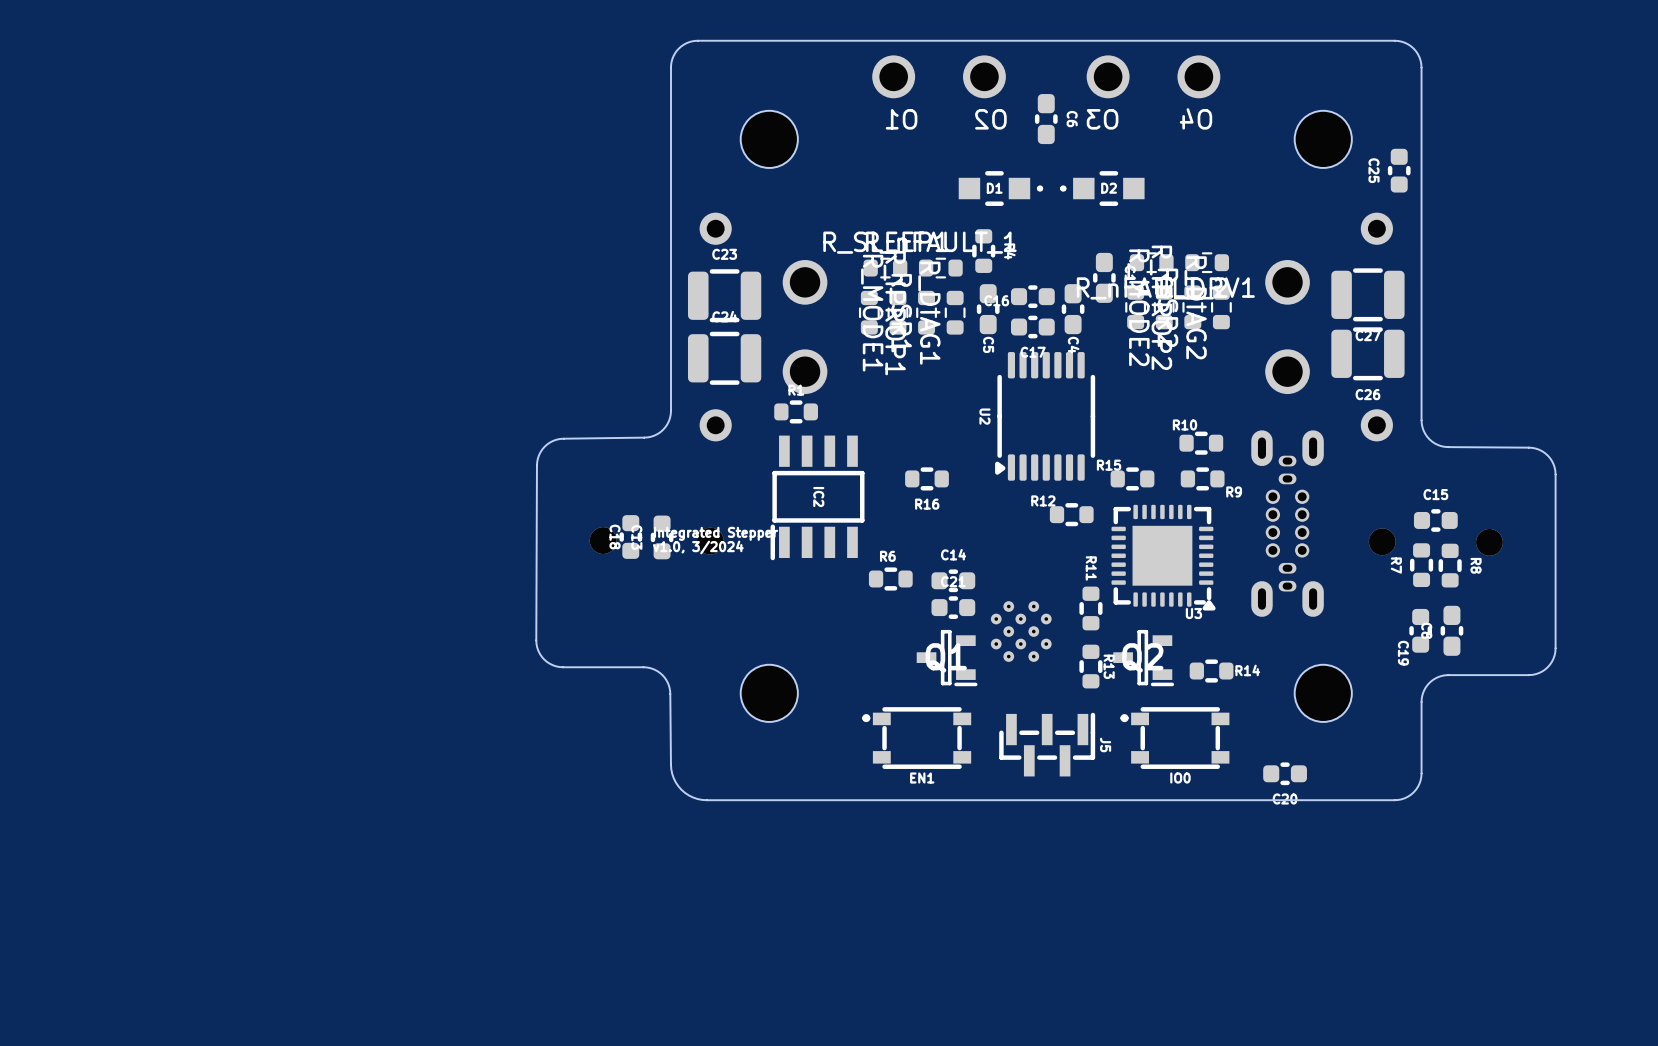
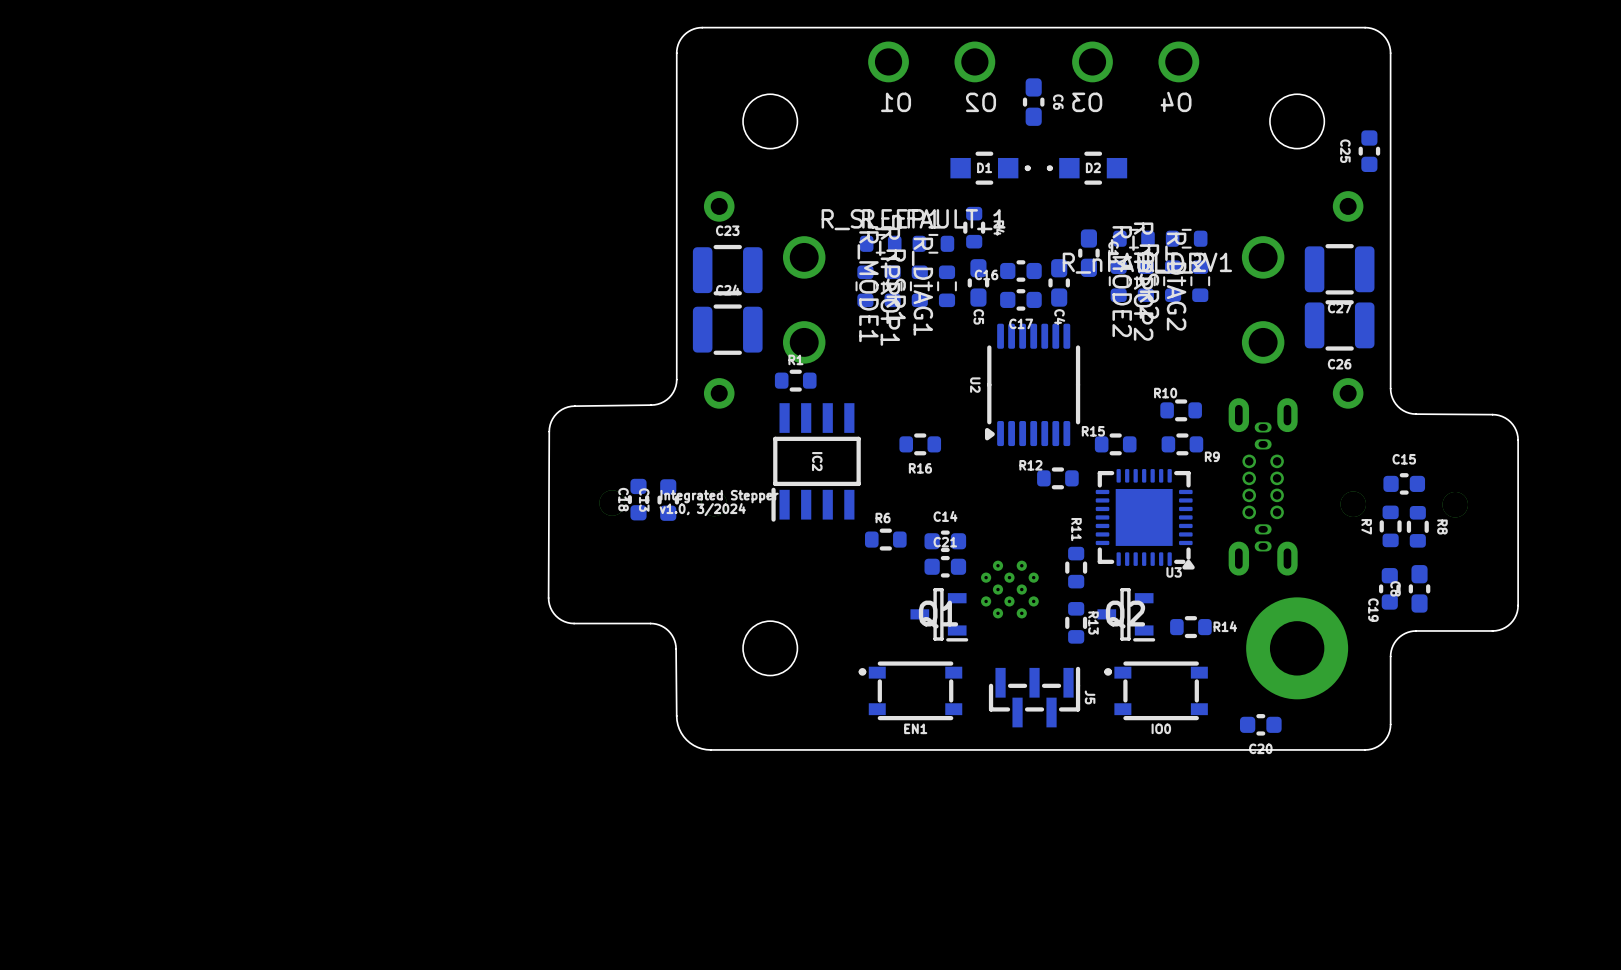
part footprint: [1294, 664, 1352, 722] -> [1246, 597, 1349, 700]

